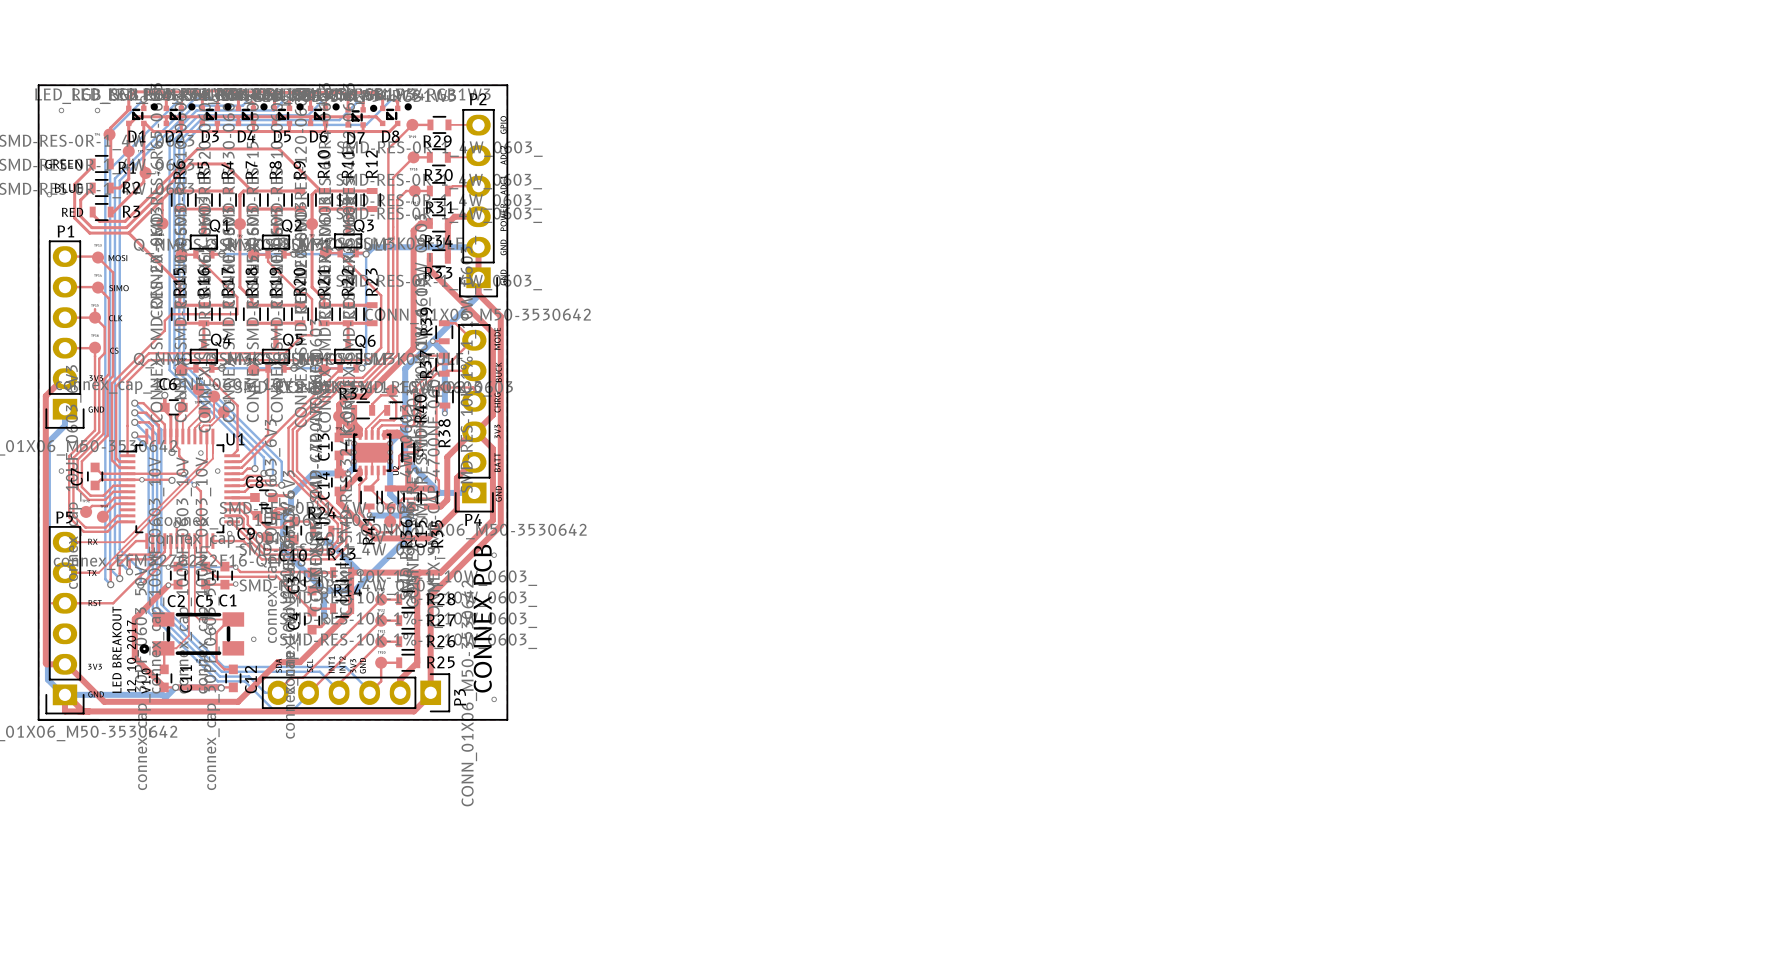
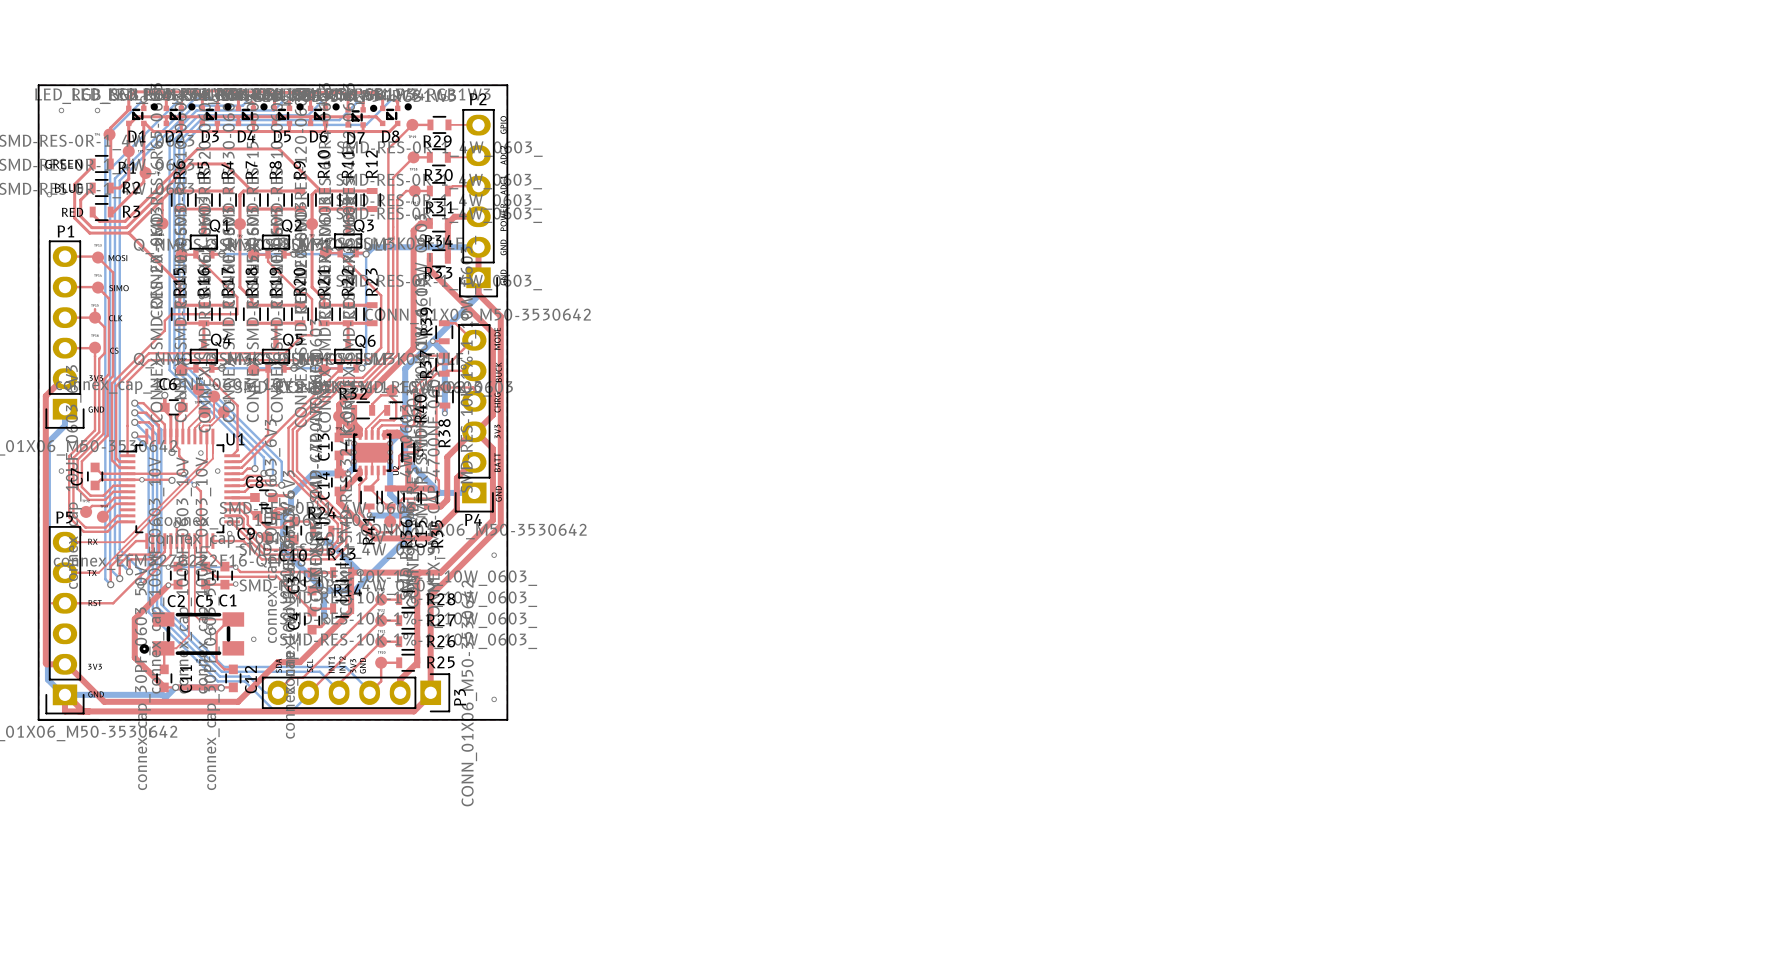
text: CONNEX PCB (482, 618) -> none
text: LED BREAKOUT (116, 649) -> none
text: 12_10_2017 (132, 656) -> none
text: V1.0 (146, 681) -> none

